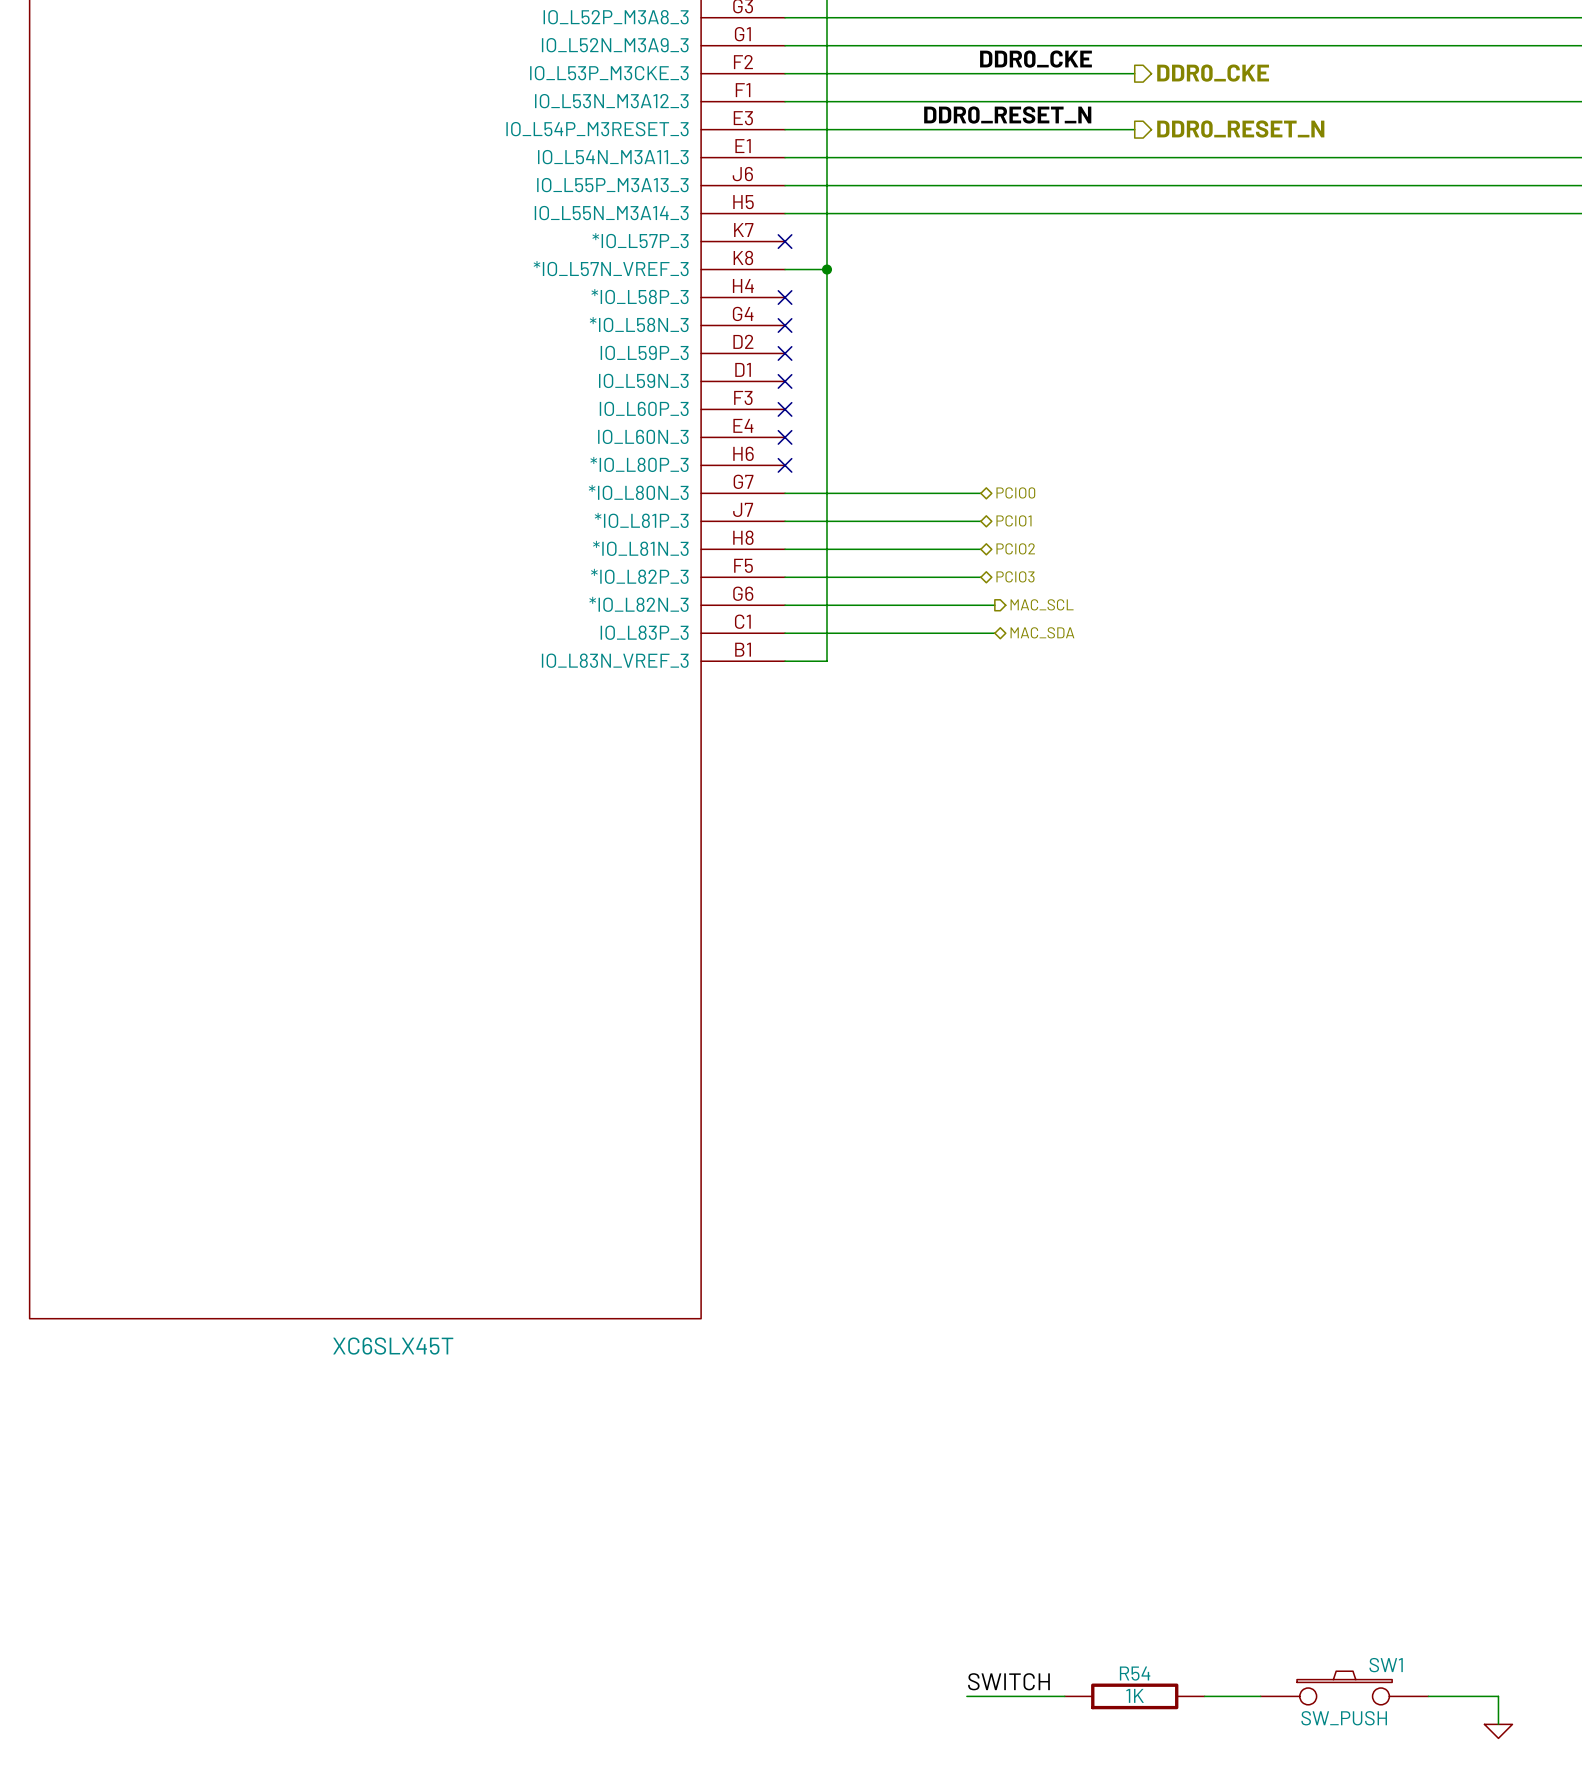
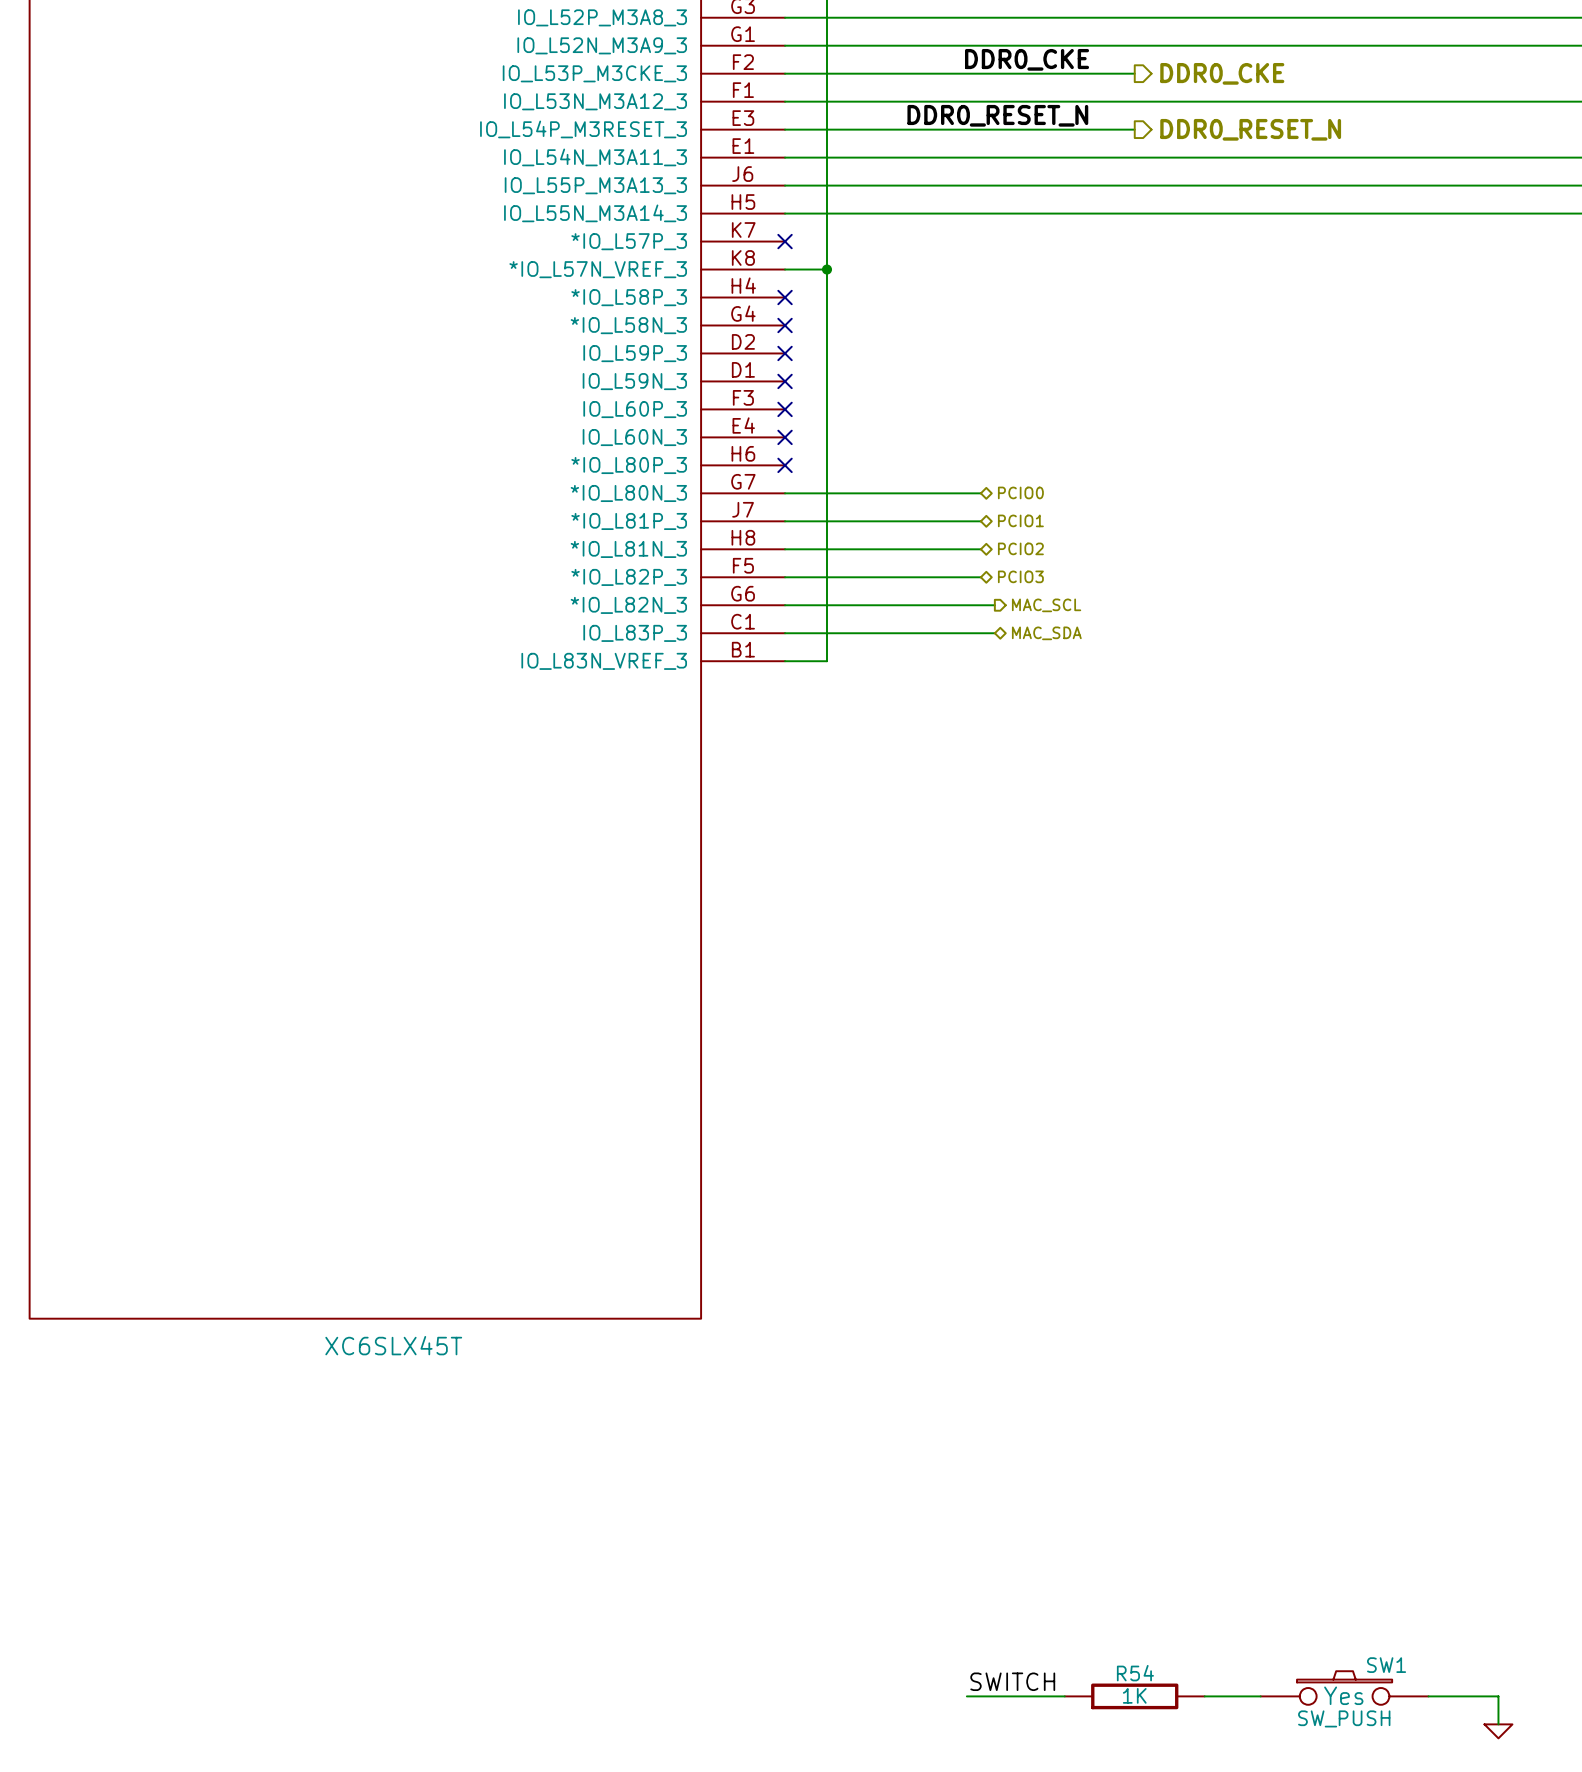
SW1 text: none -> Yes (1343, 1695)

